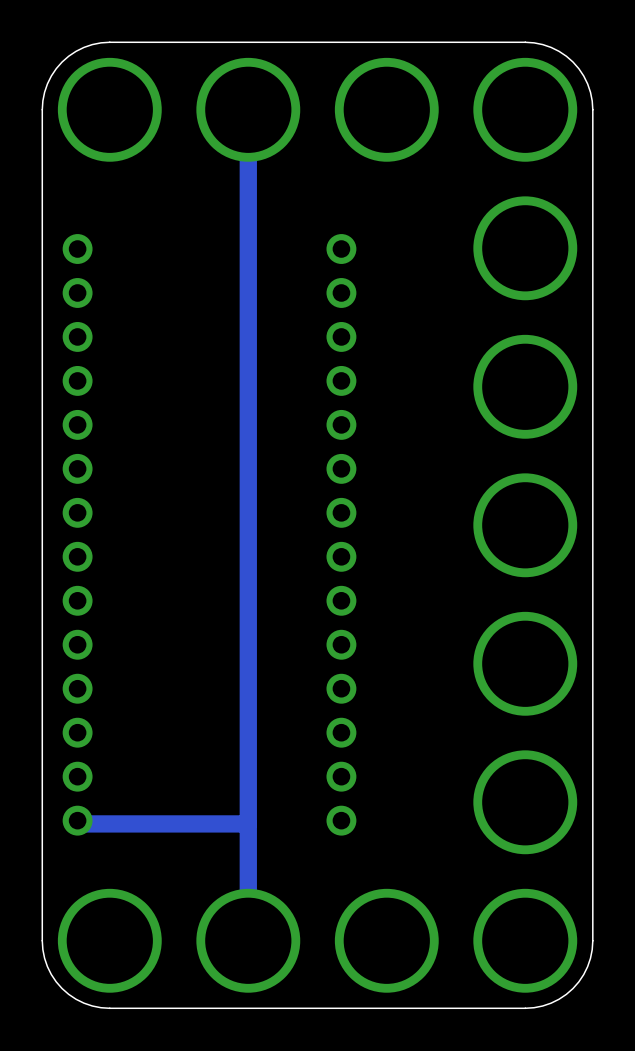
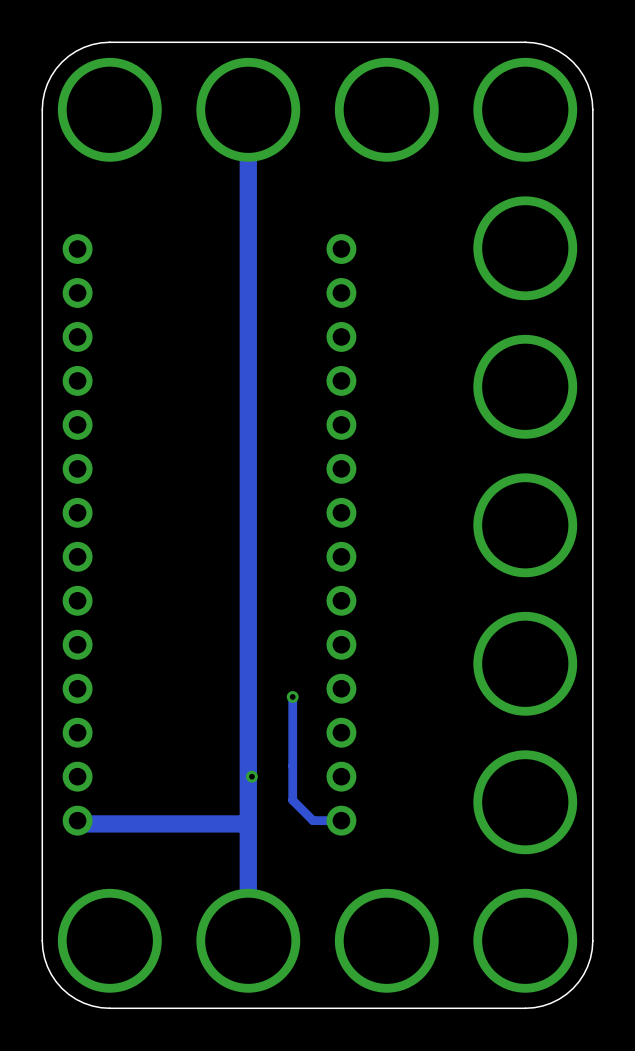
track: none -> (292, 696) (292, 800) (313, 820) (341, 820)
via: none -> (292, 696)
via: none -> (251, 776)

